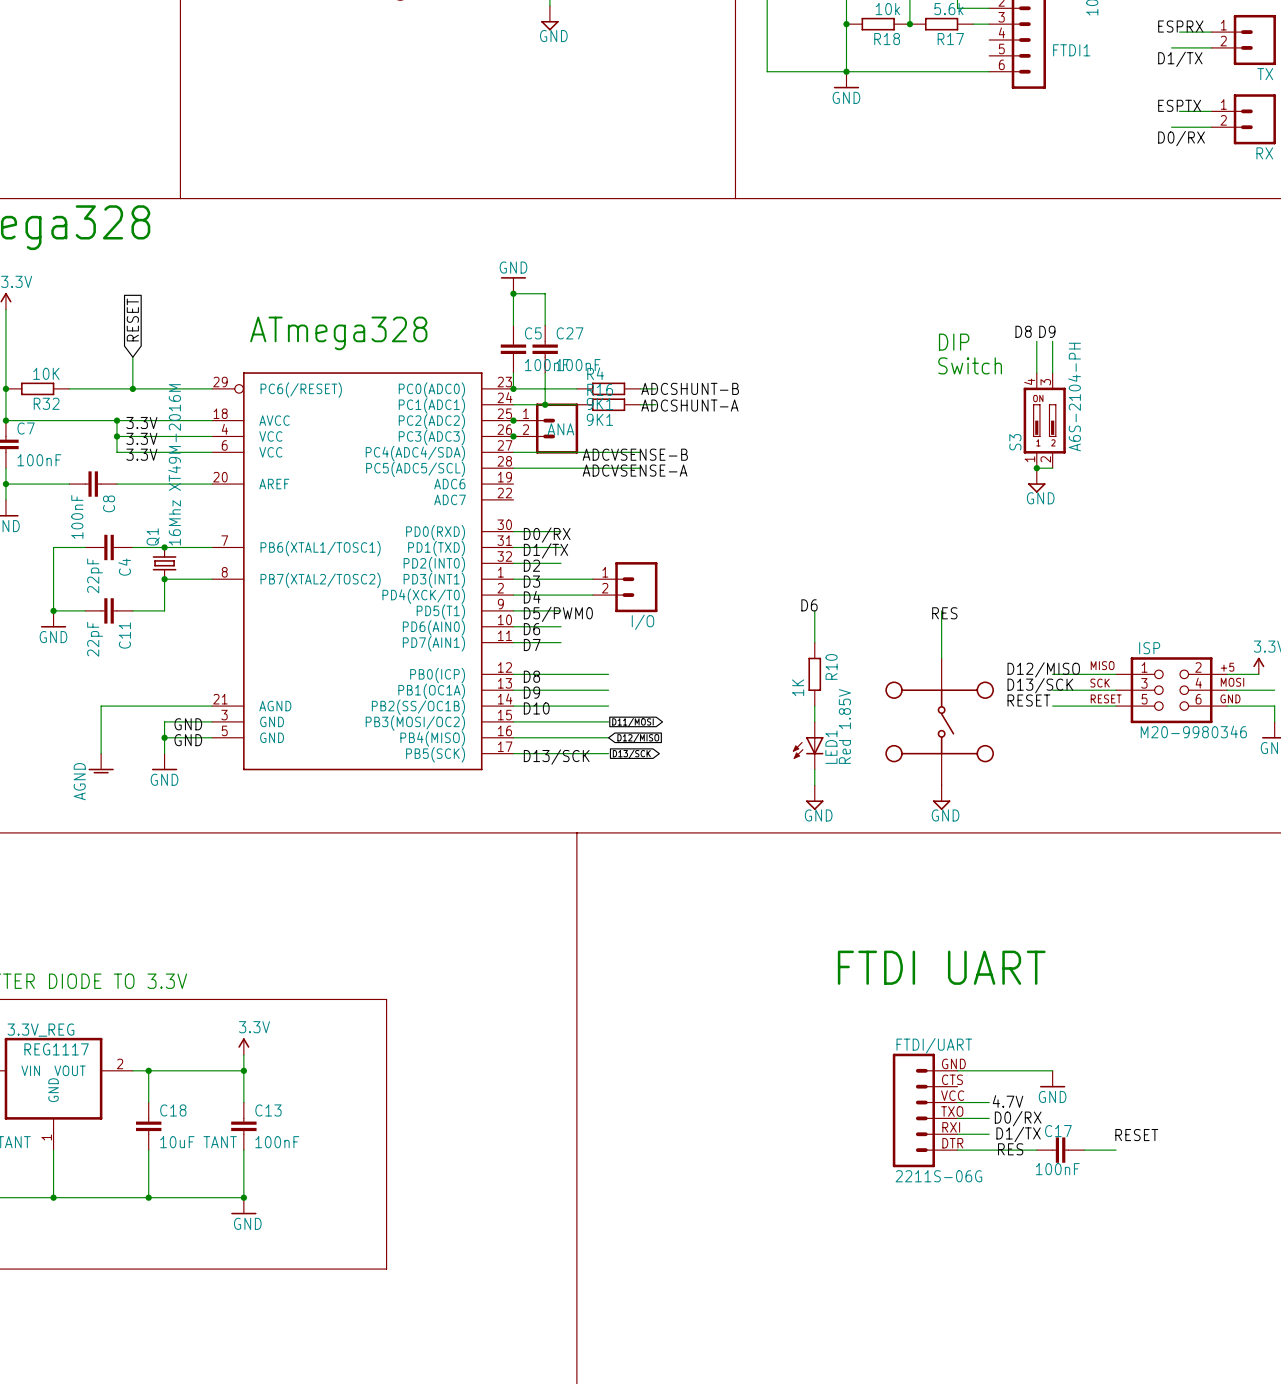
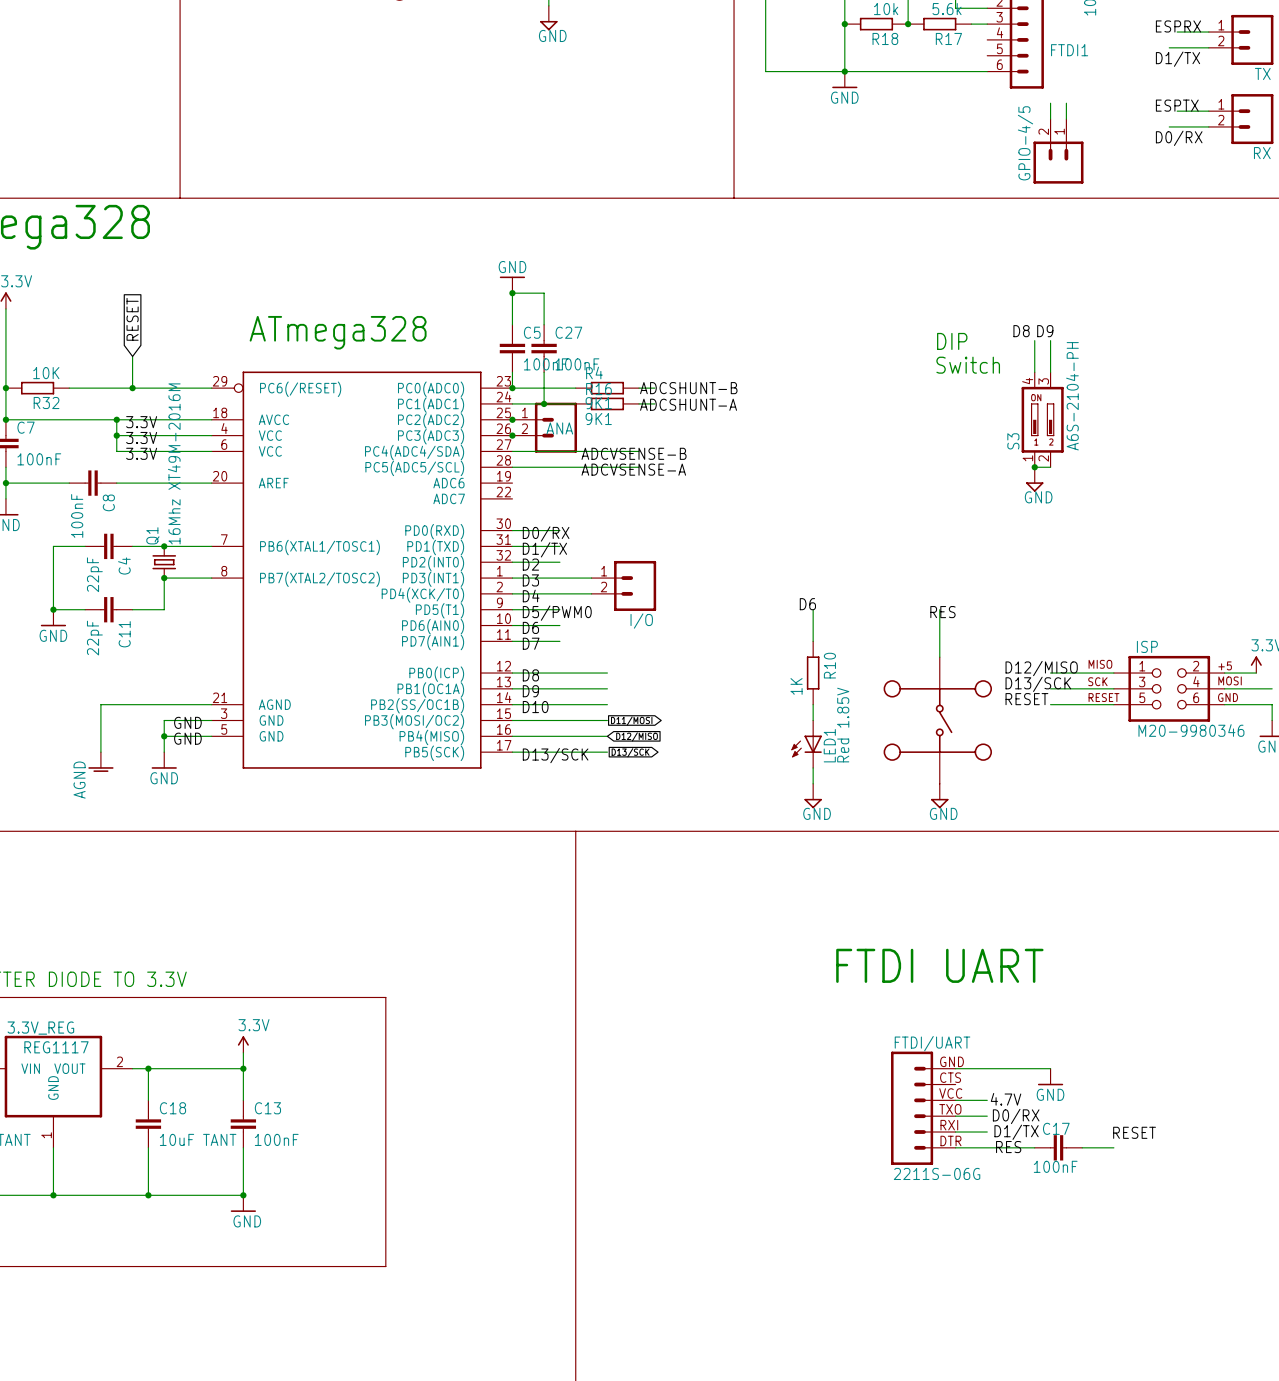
wire: none -> (1050, 103) (1050, 119)
wire: none -> (1066, 103) (1066, 119)
GPIO-4/5: none -> (1058, 151)

